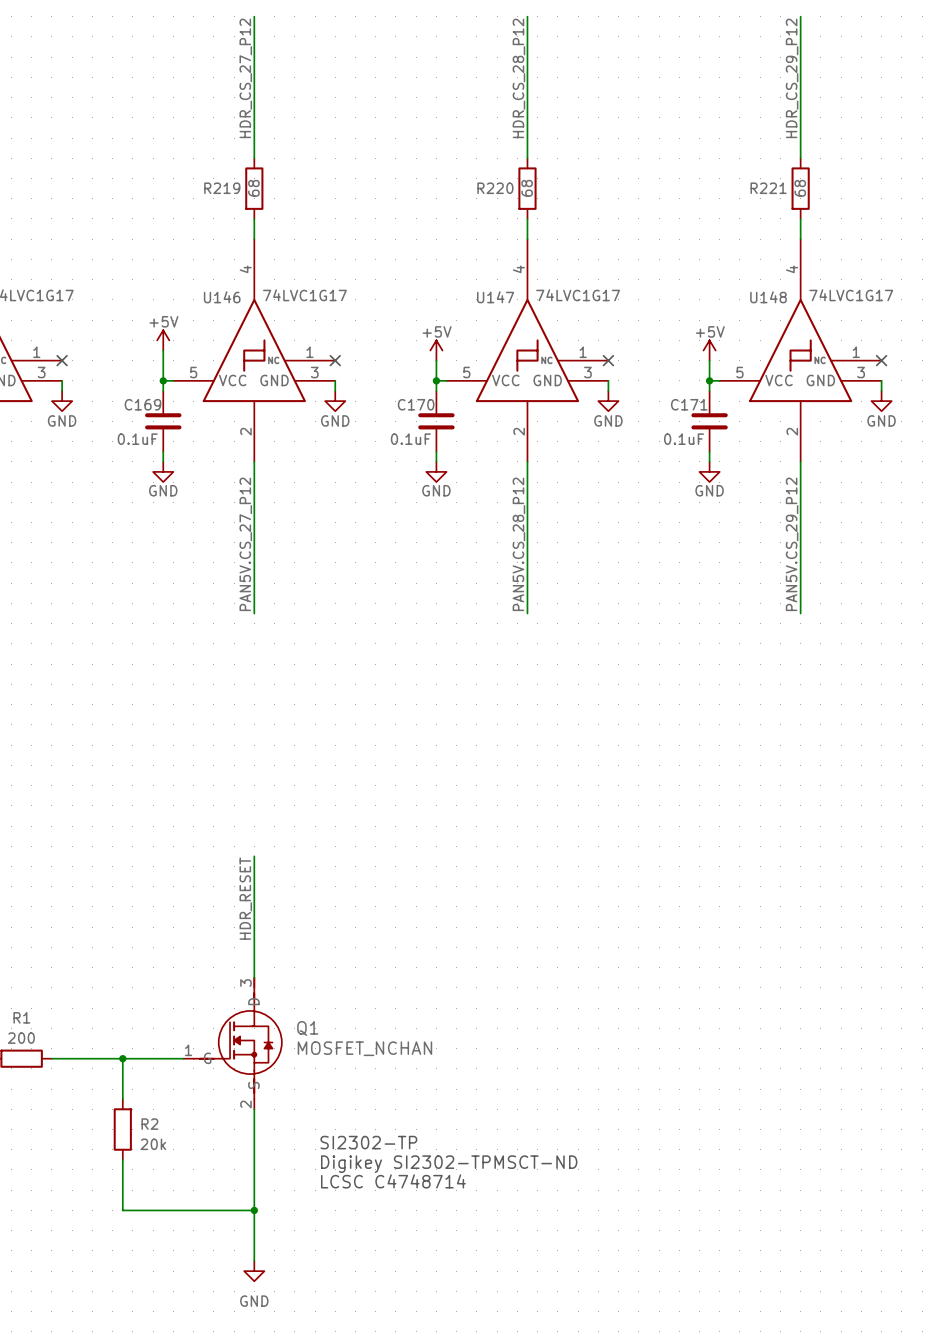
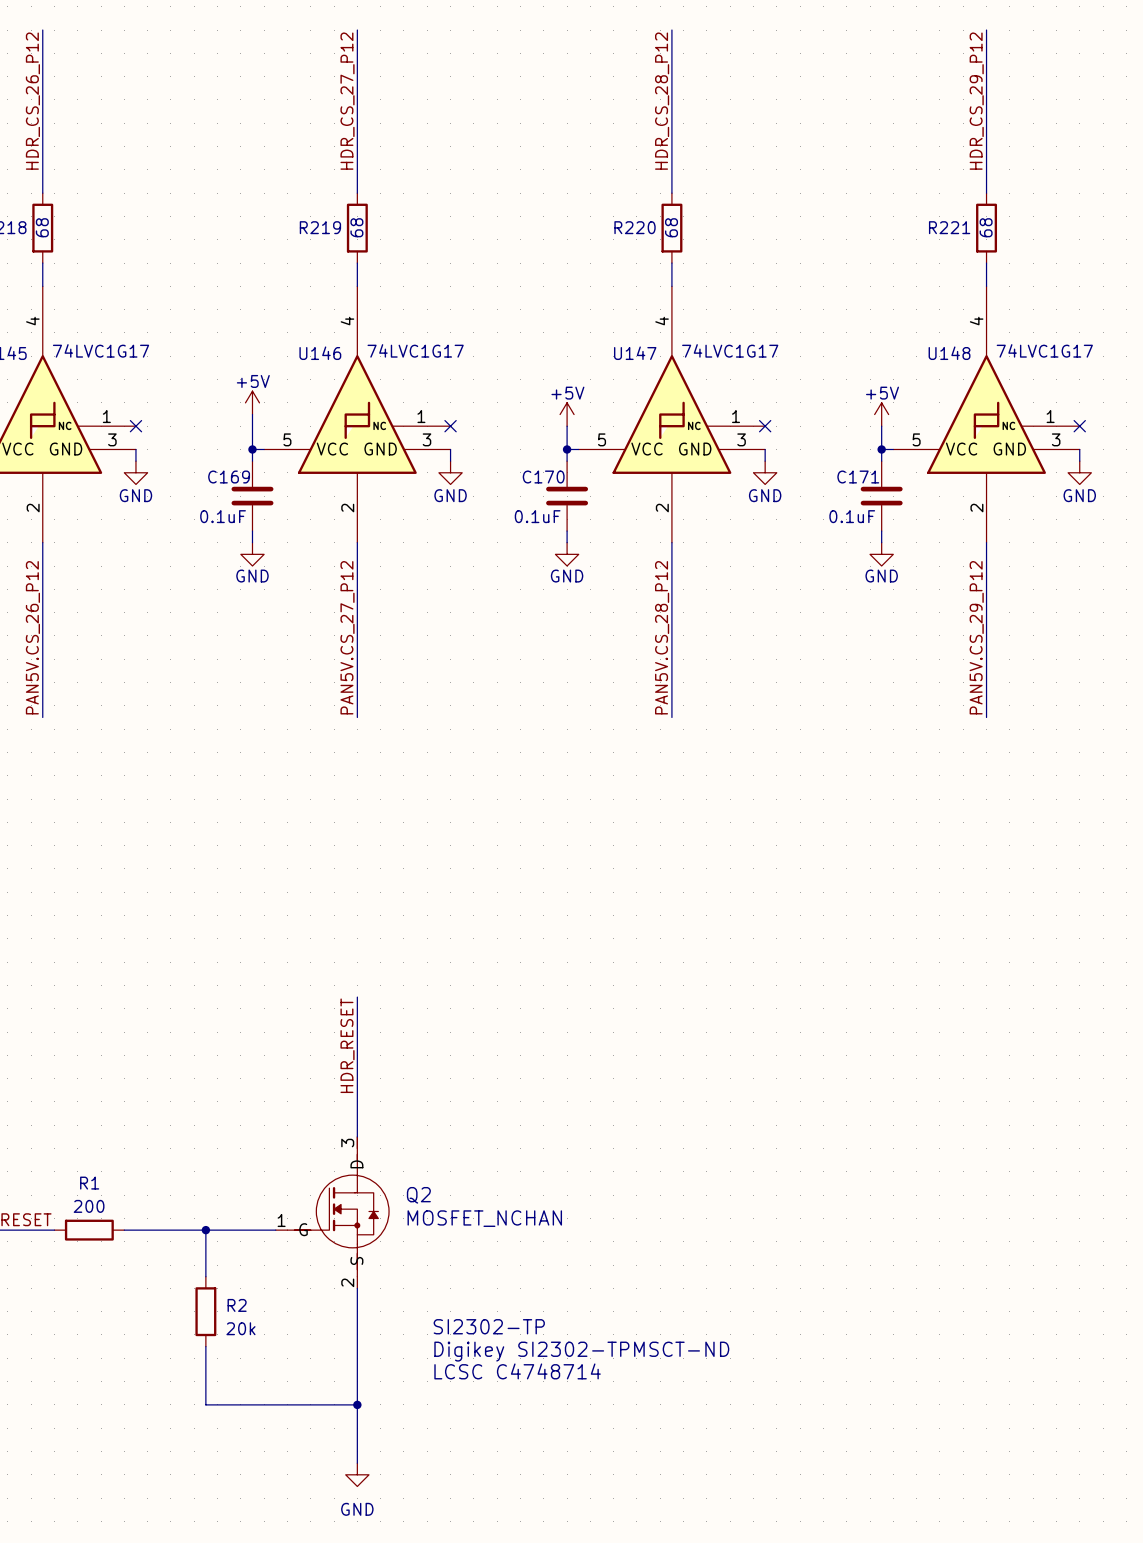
Q1 name: Q1 (307, 1028) -> Q2 (418, 1195)

